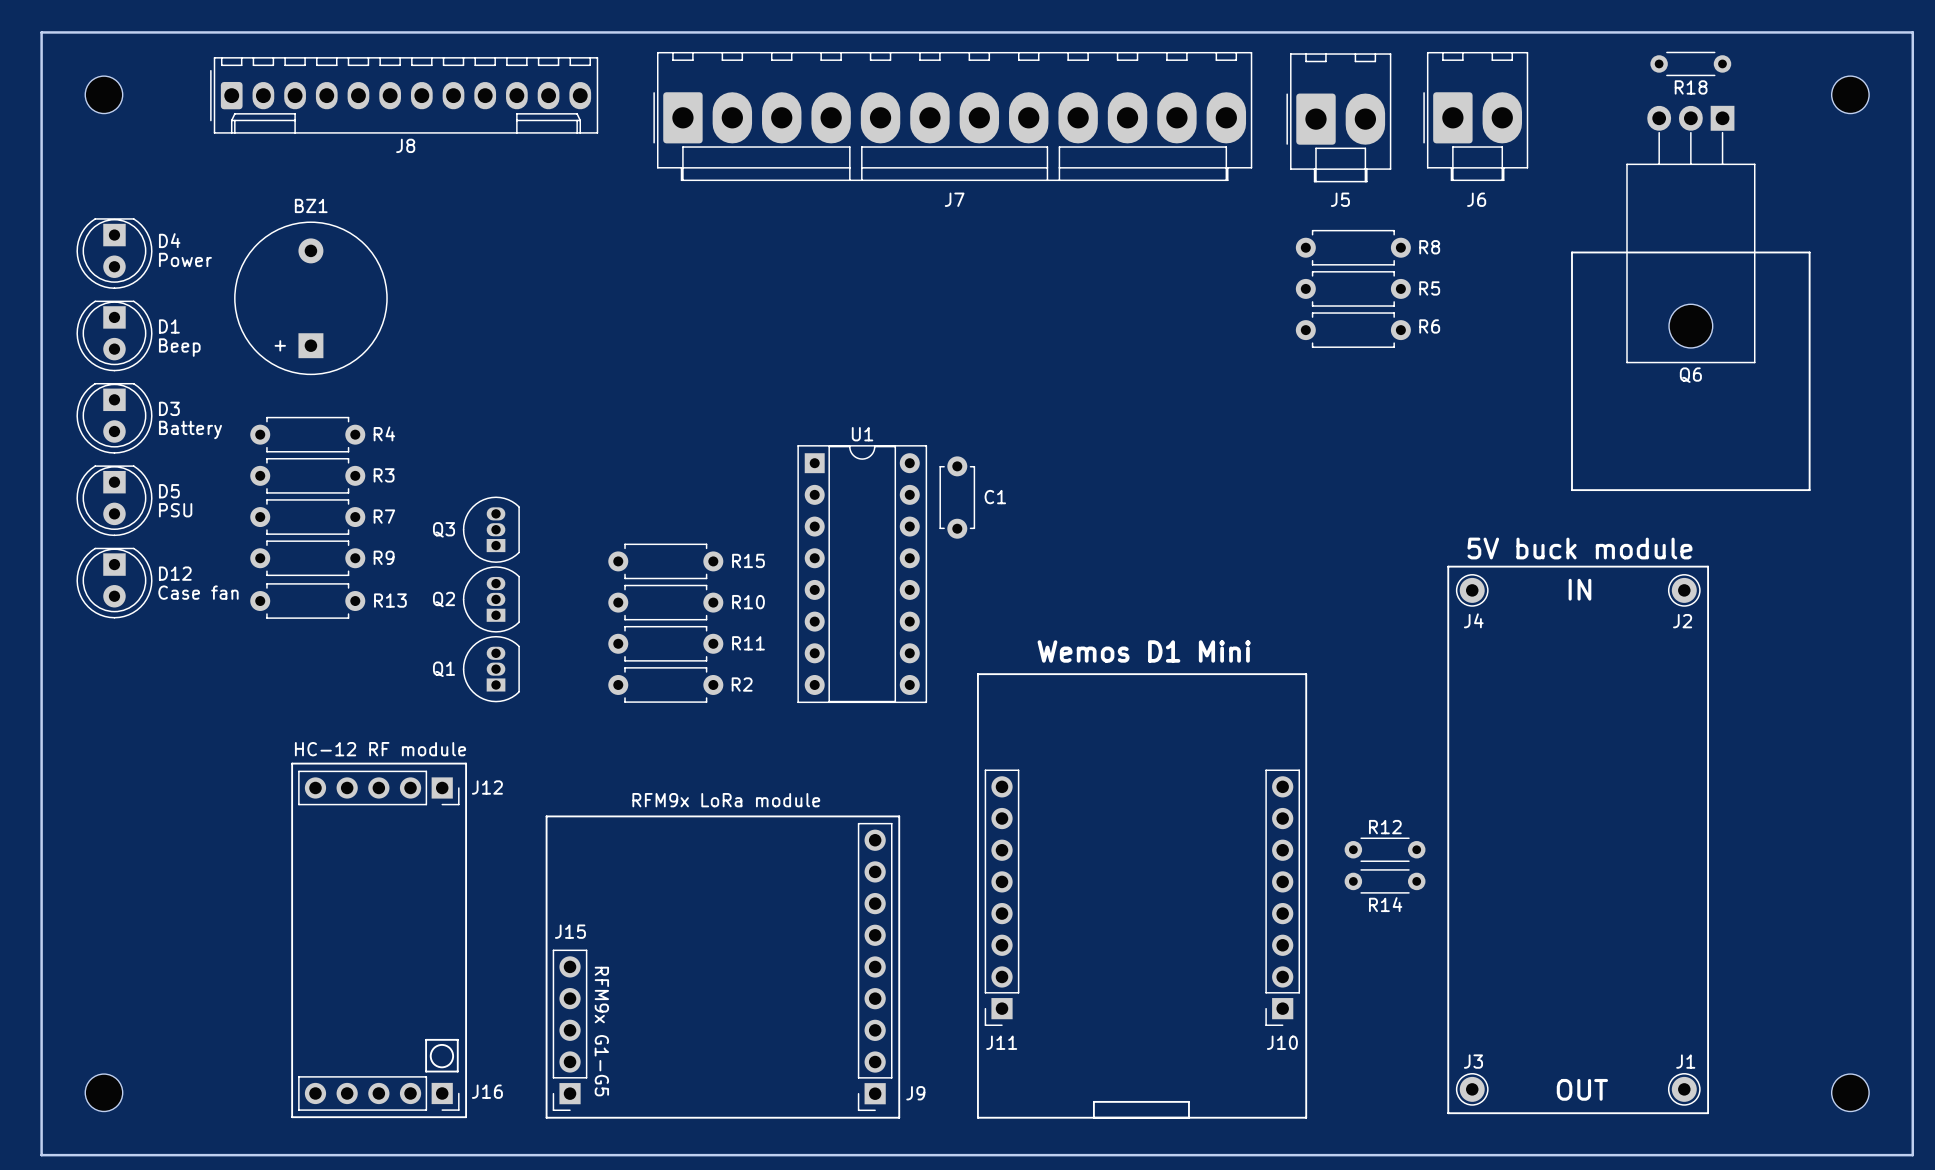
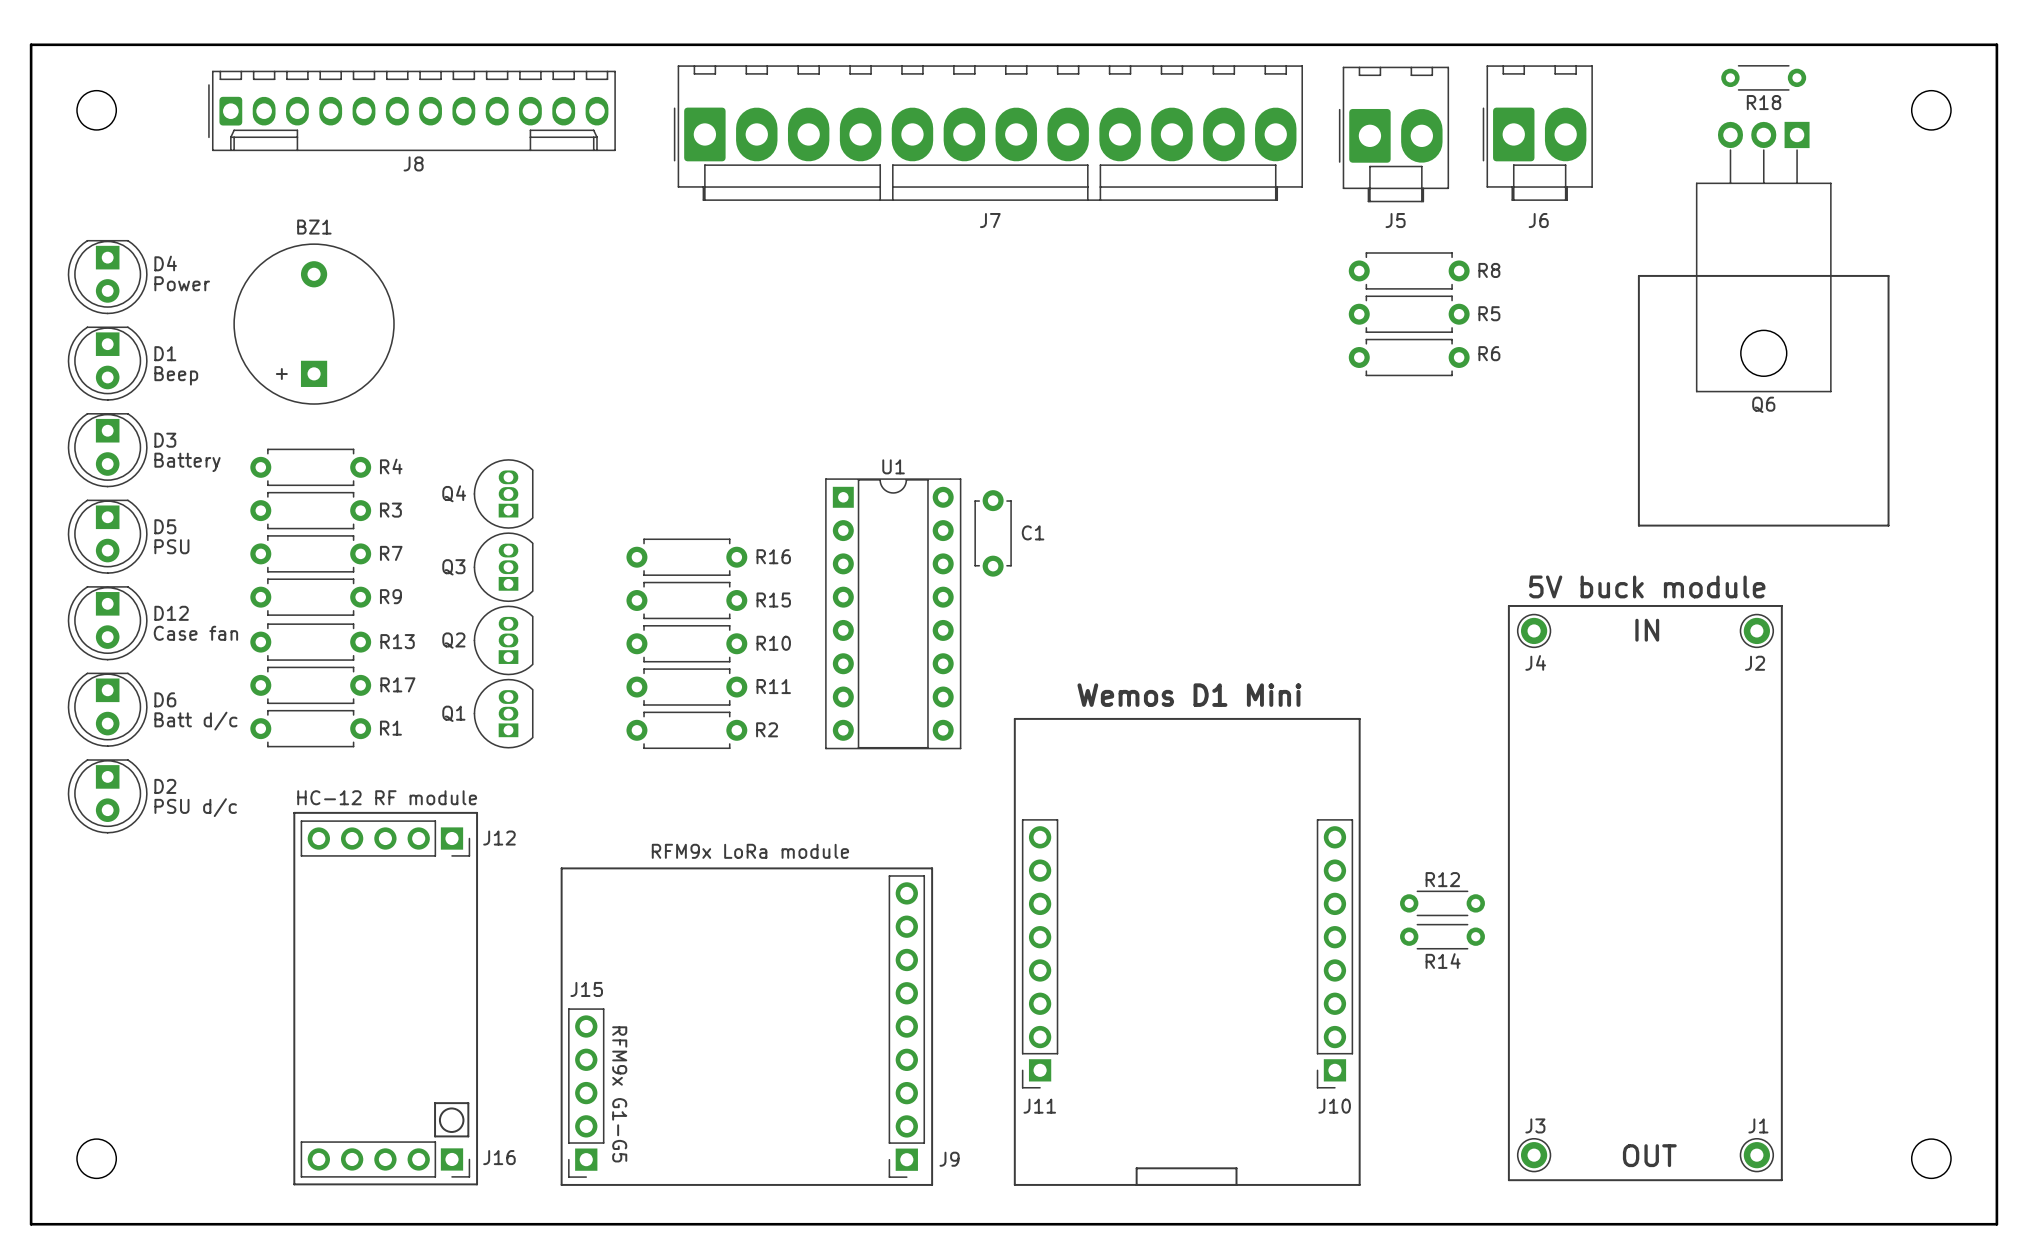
Q4: none -> (503, 493)
R16: none -> (686, 557)
R17: none -> (310, 685)
D6: none -> (107, 709)
R1: none -> (310, 728)
D2: none -> (107, 796)

